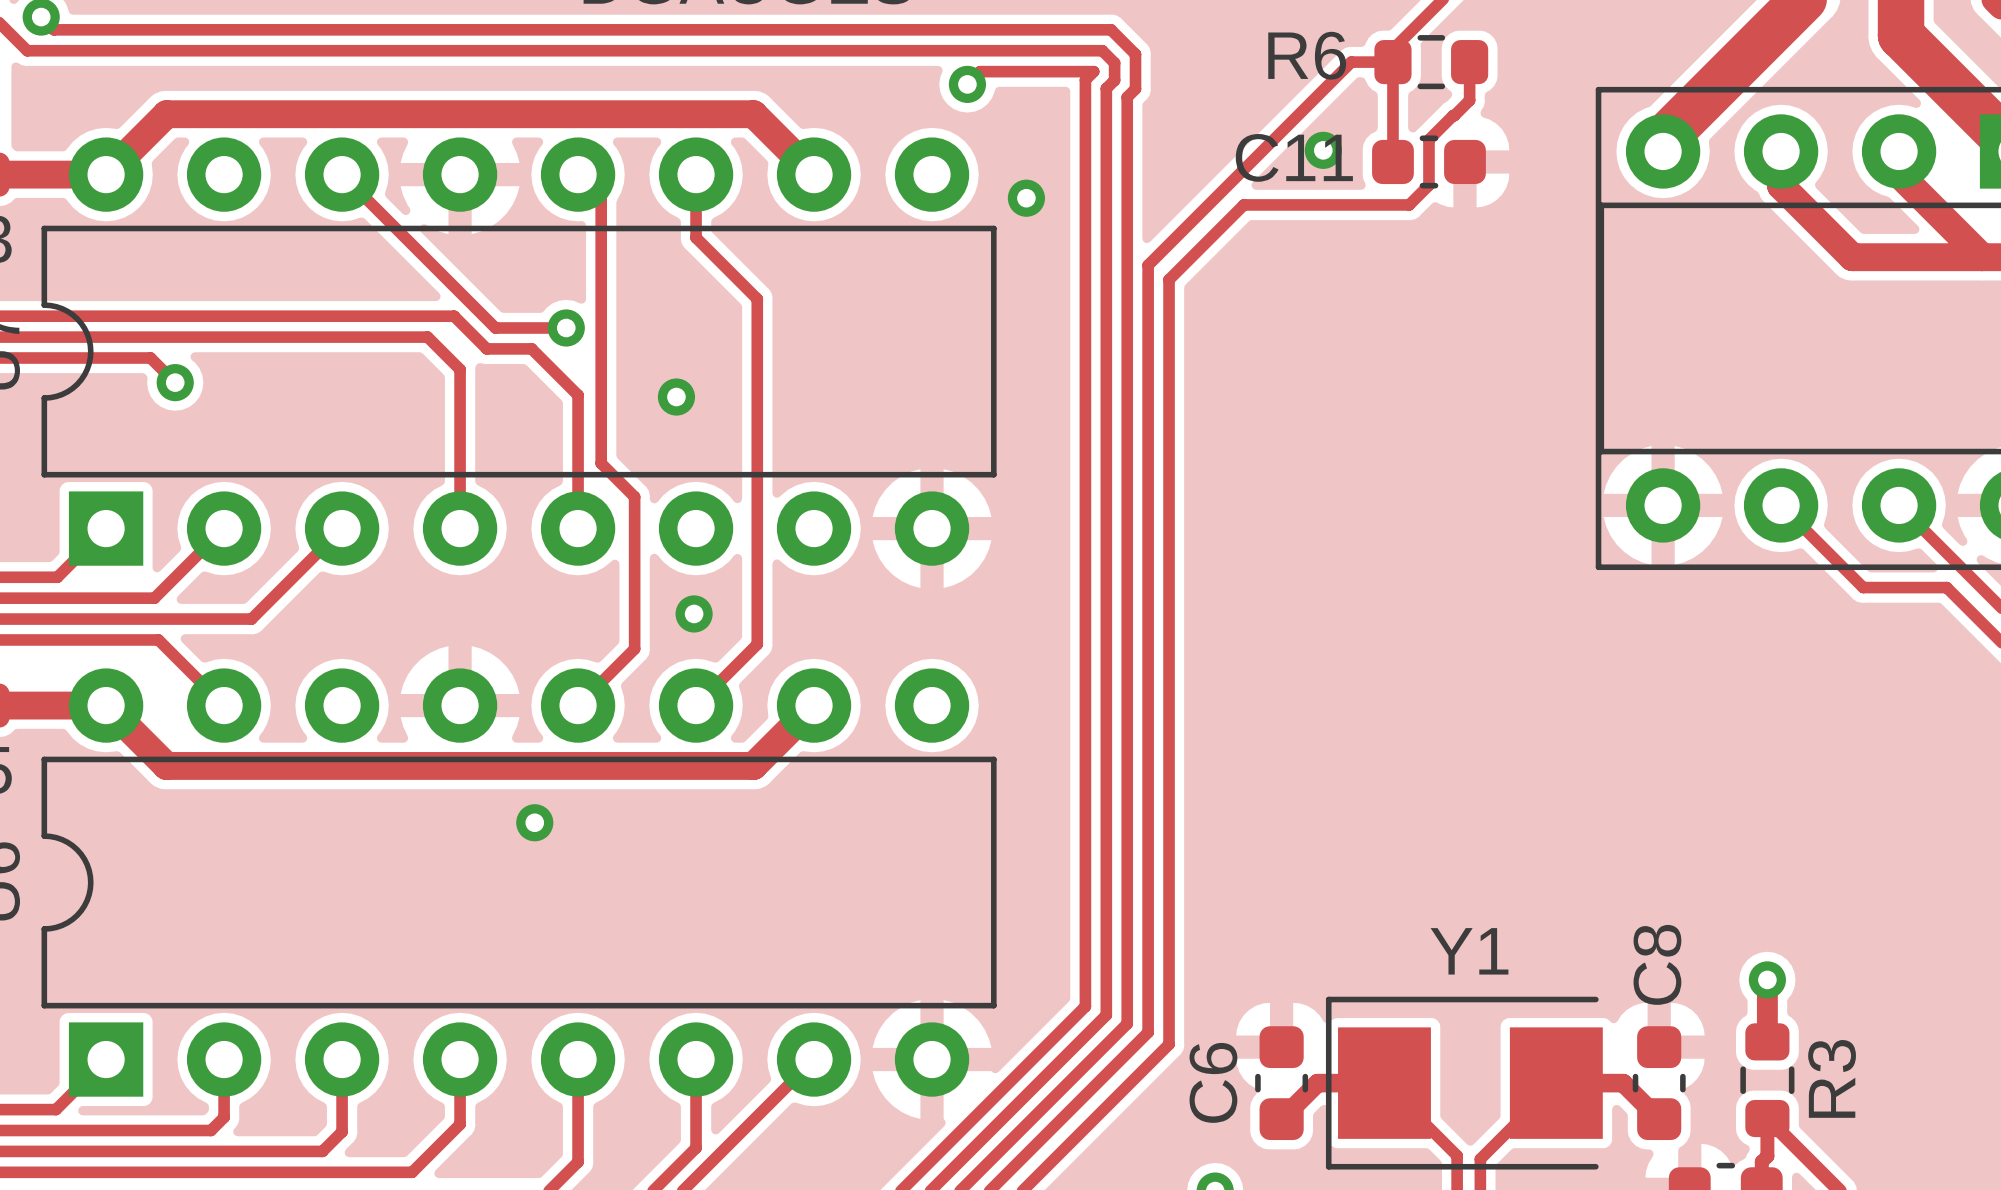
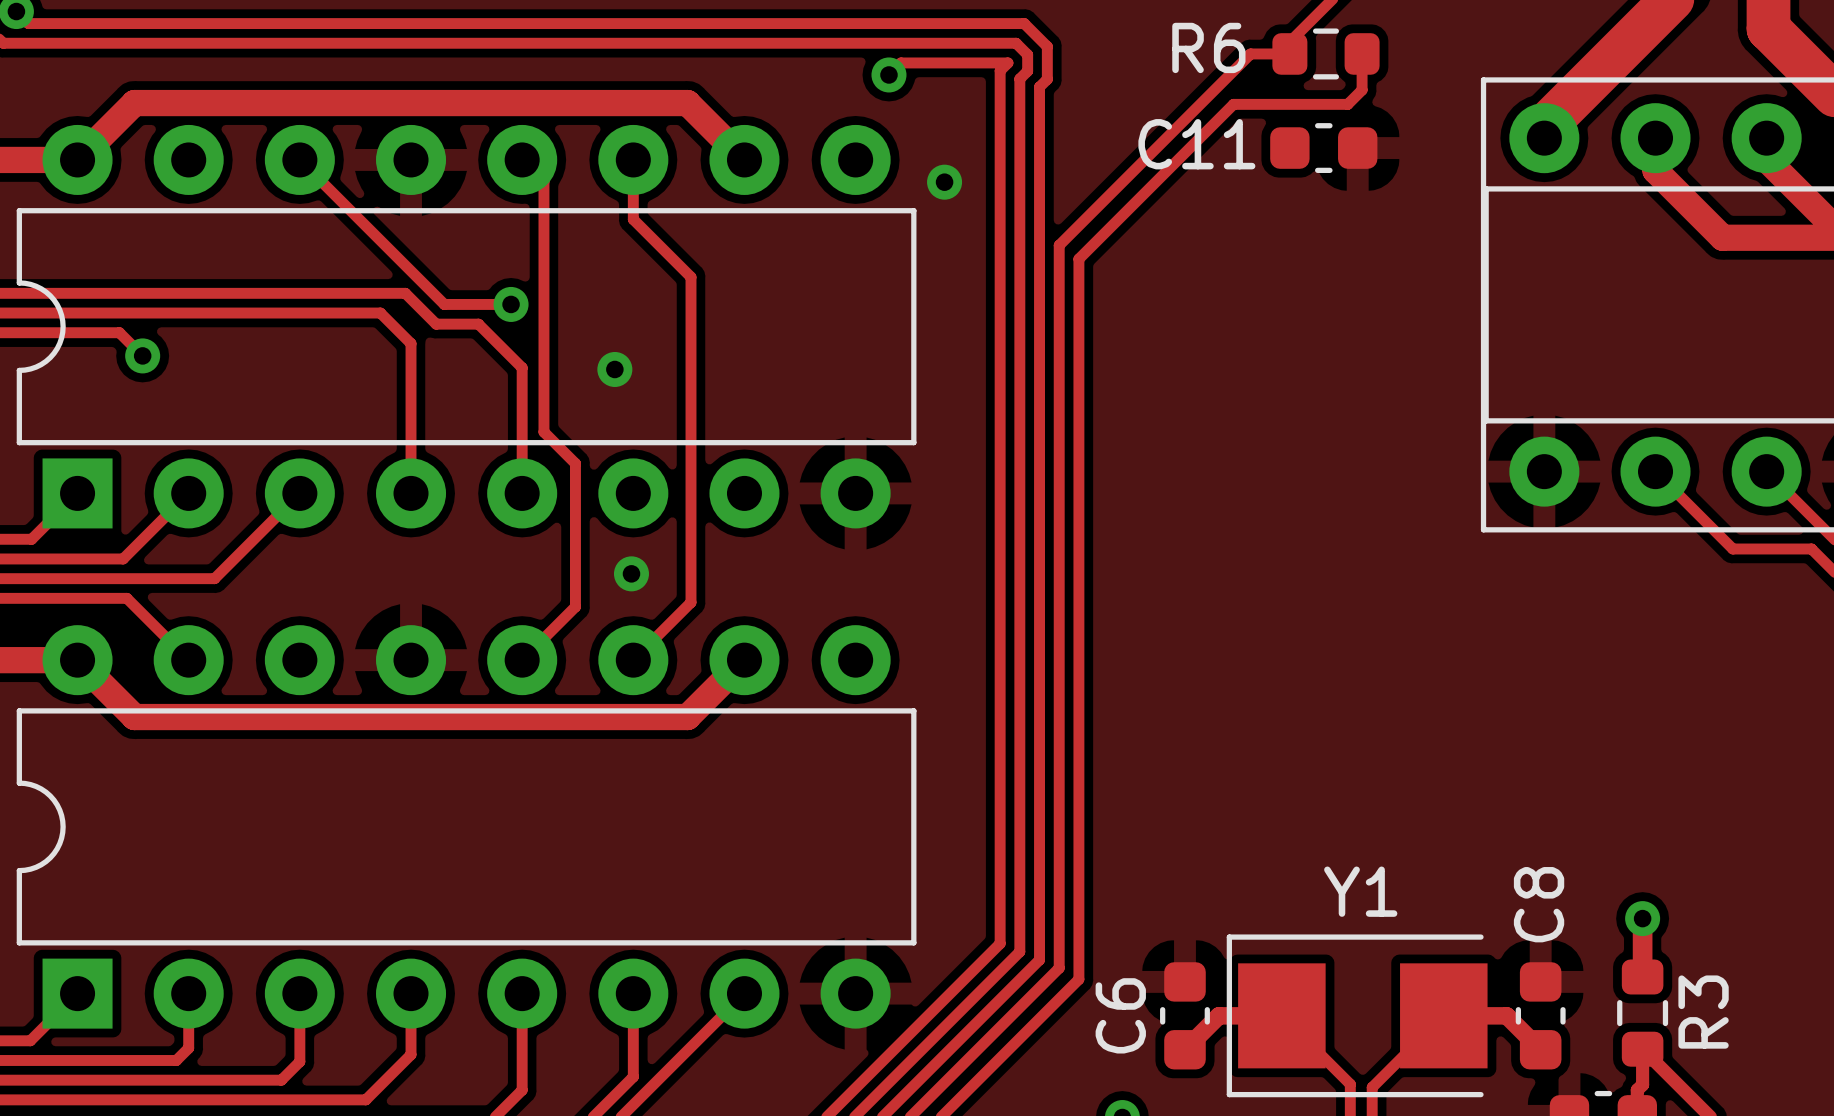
track: (1392, 62) (1392, 161) -> none
track: (1453, 115) (1428, 139) (1428, 185) (1409, 204) (1243, 204) -> (1346, 104) (1233, 104) (1149, 188)
via: (1323, 150) -> none
via: (534, 822) -> none

